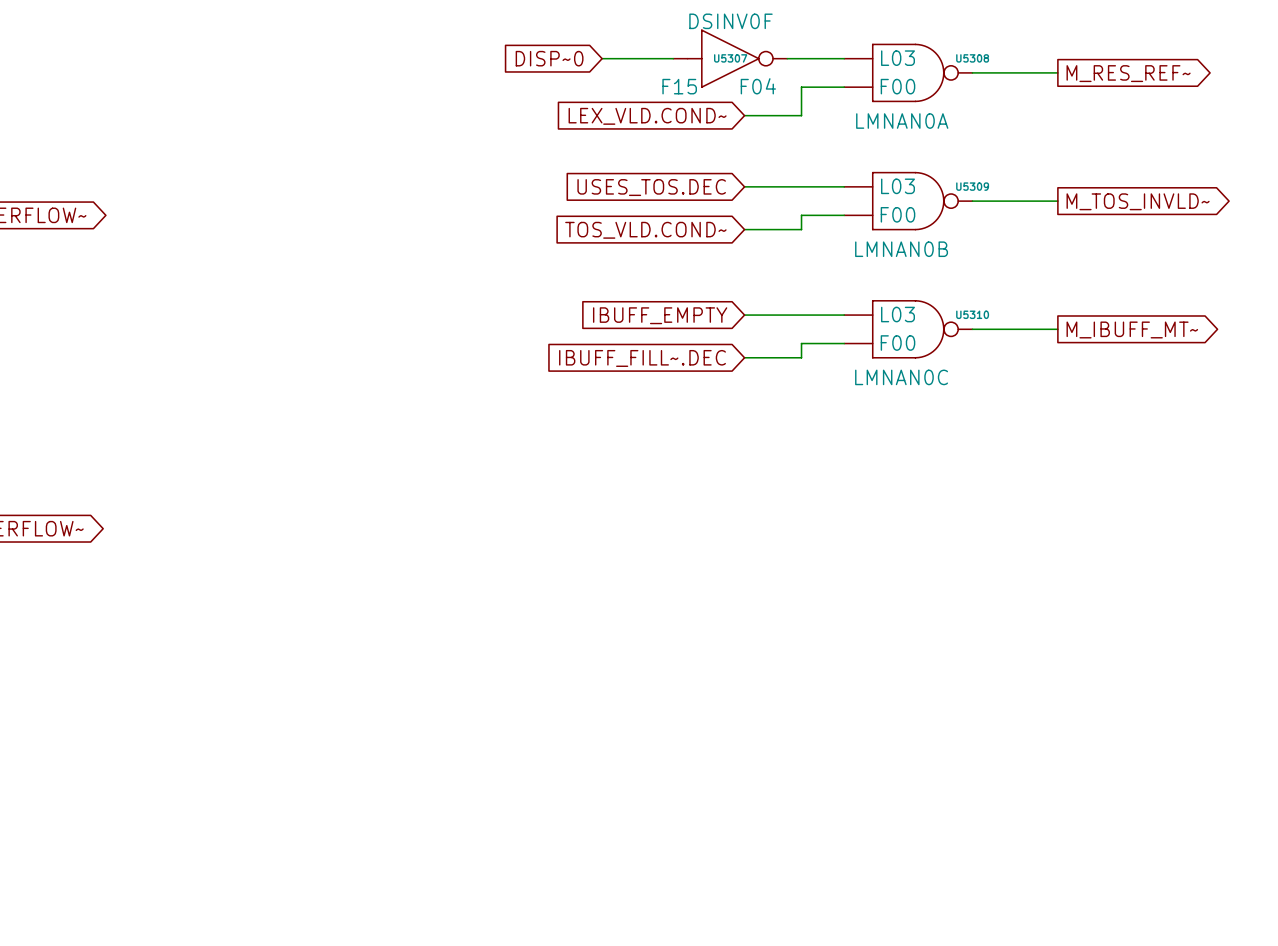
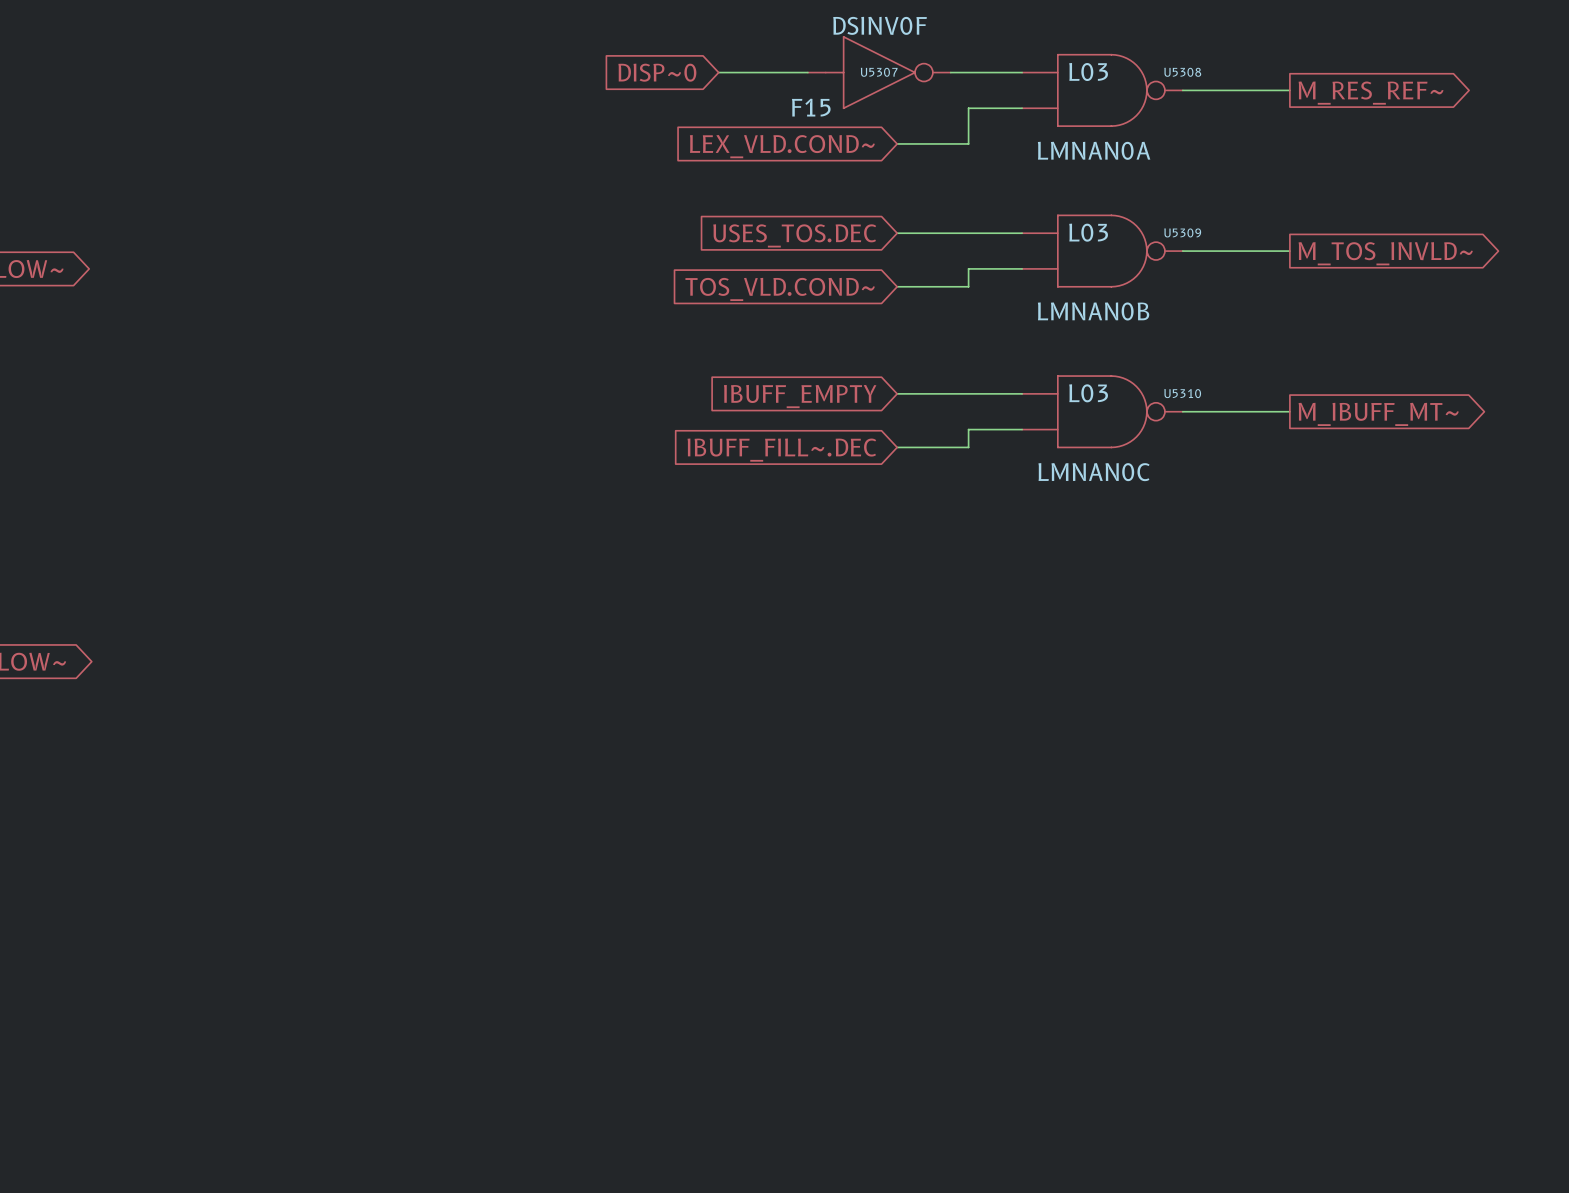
U5307 value: F04 (758, 86) -> none
U5308 value: F00 (898, 86) -> none
U5309 value: F00 (898, 214) -> none
U5310 value: F00 (898, 343) -> none

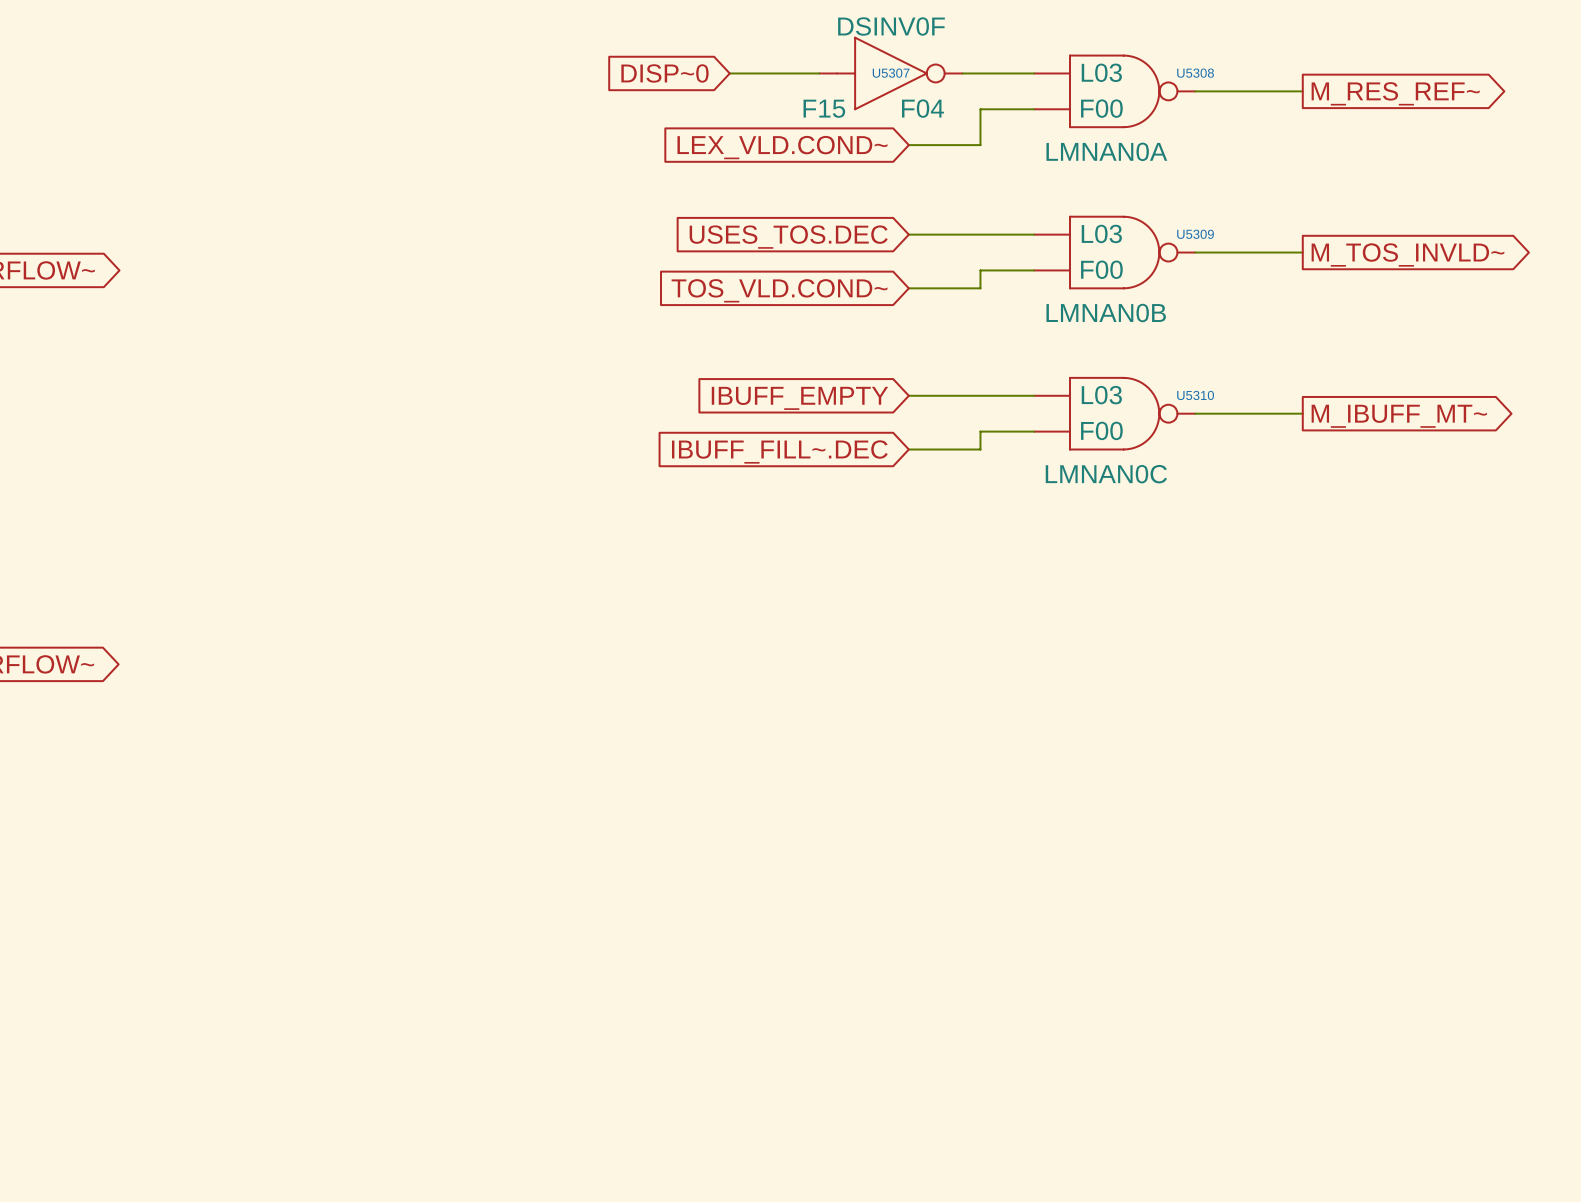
U5307 value: none -> F04 (923, 108)
U5308 value: none -> F00 (1101, 108)
U5309 value: none -> F00 (1101, 269)
U5310 value: none -> F00 (1101, 430)

